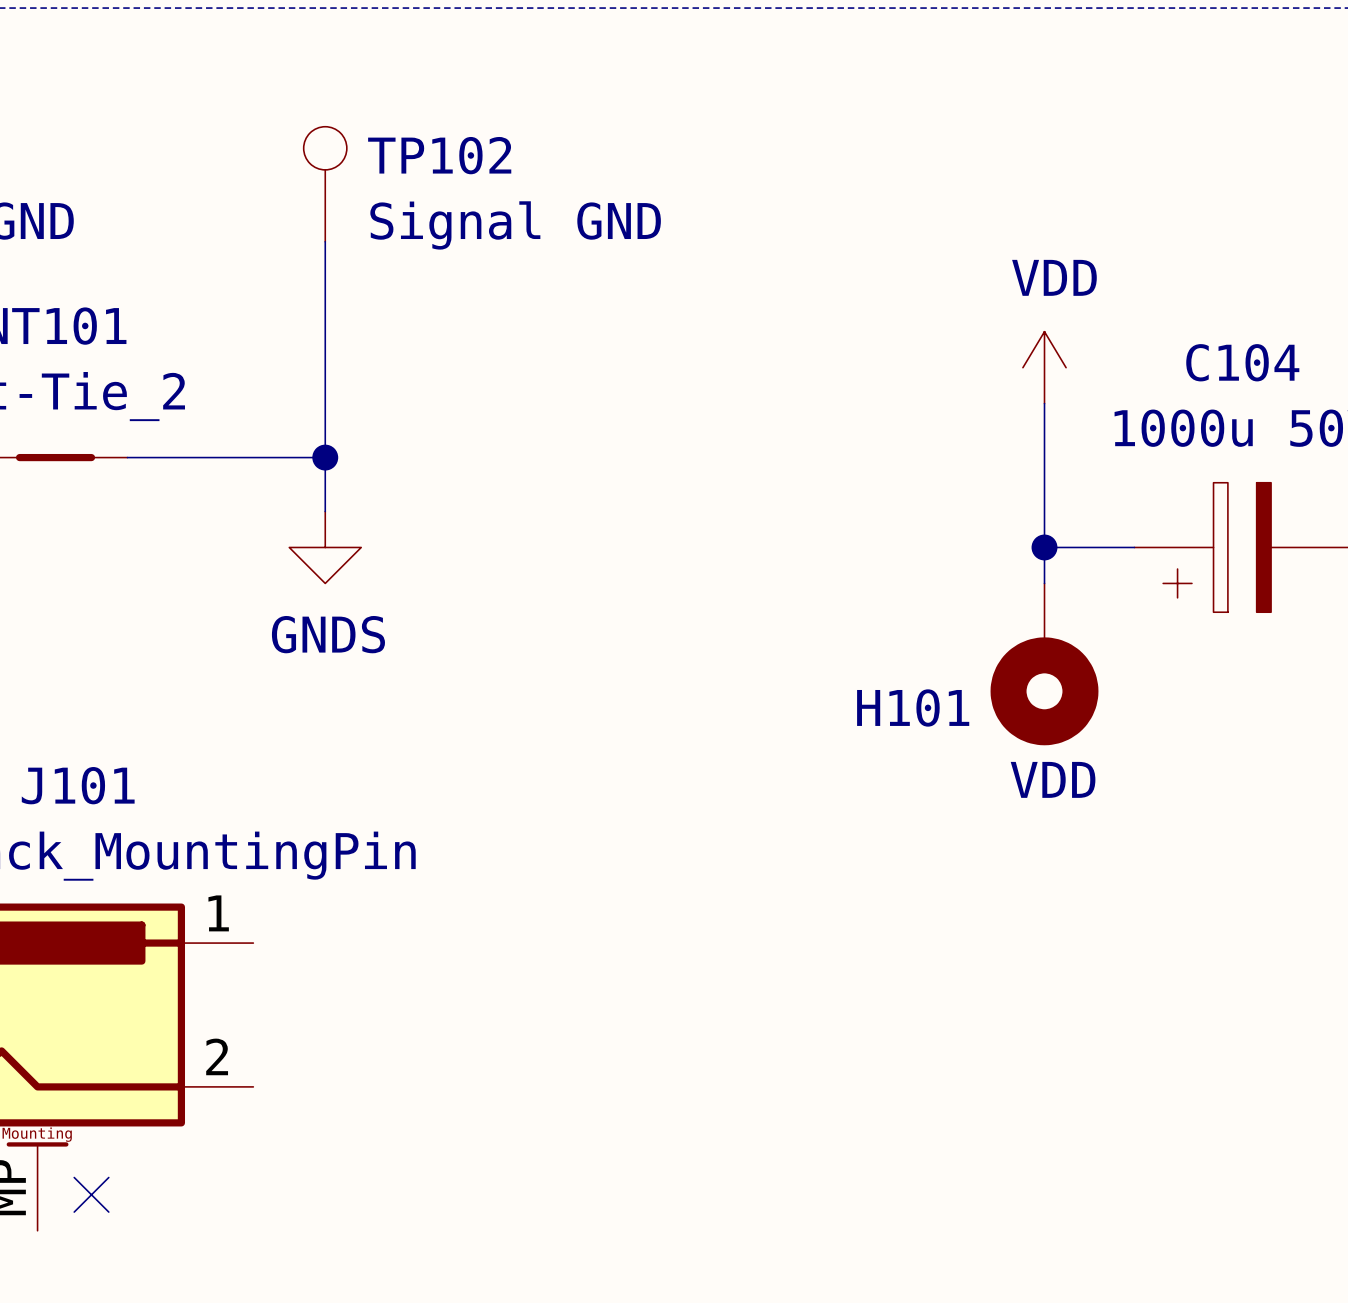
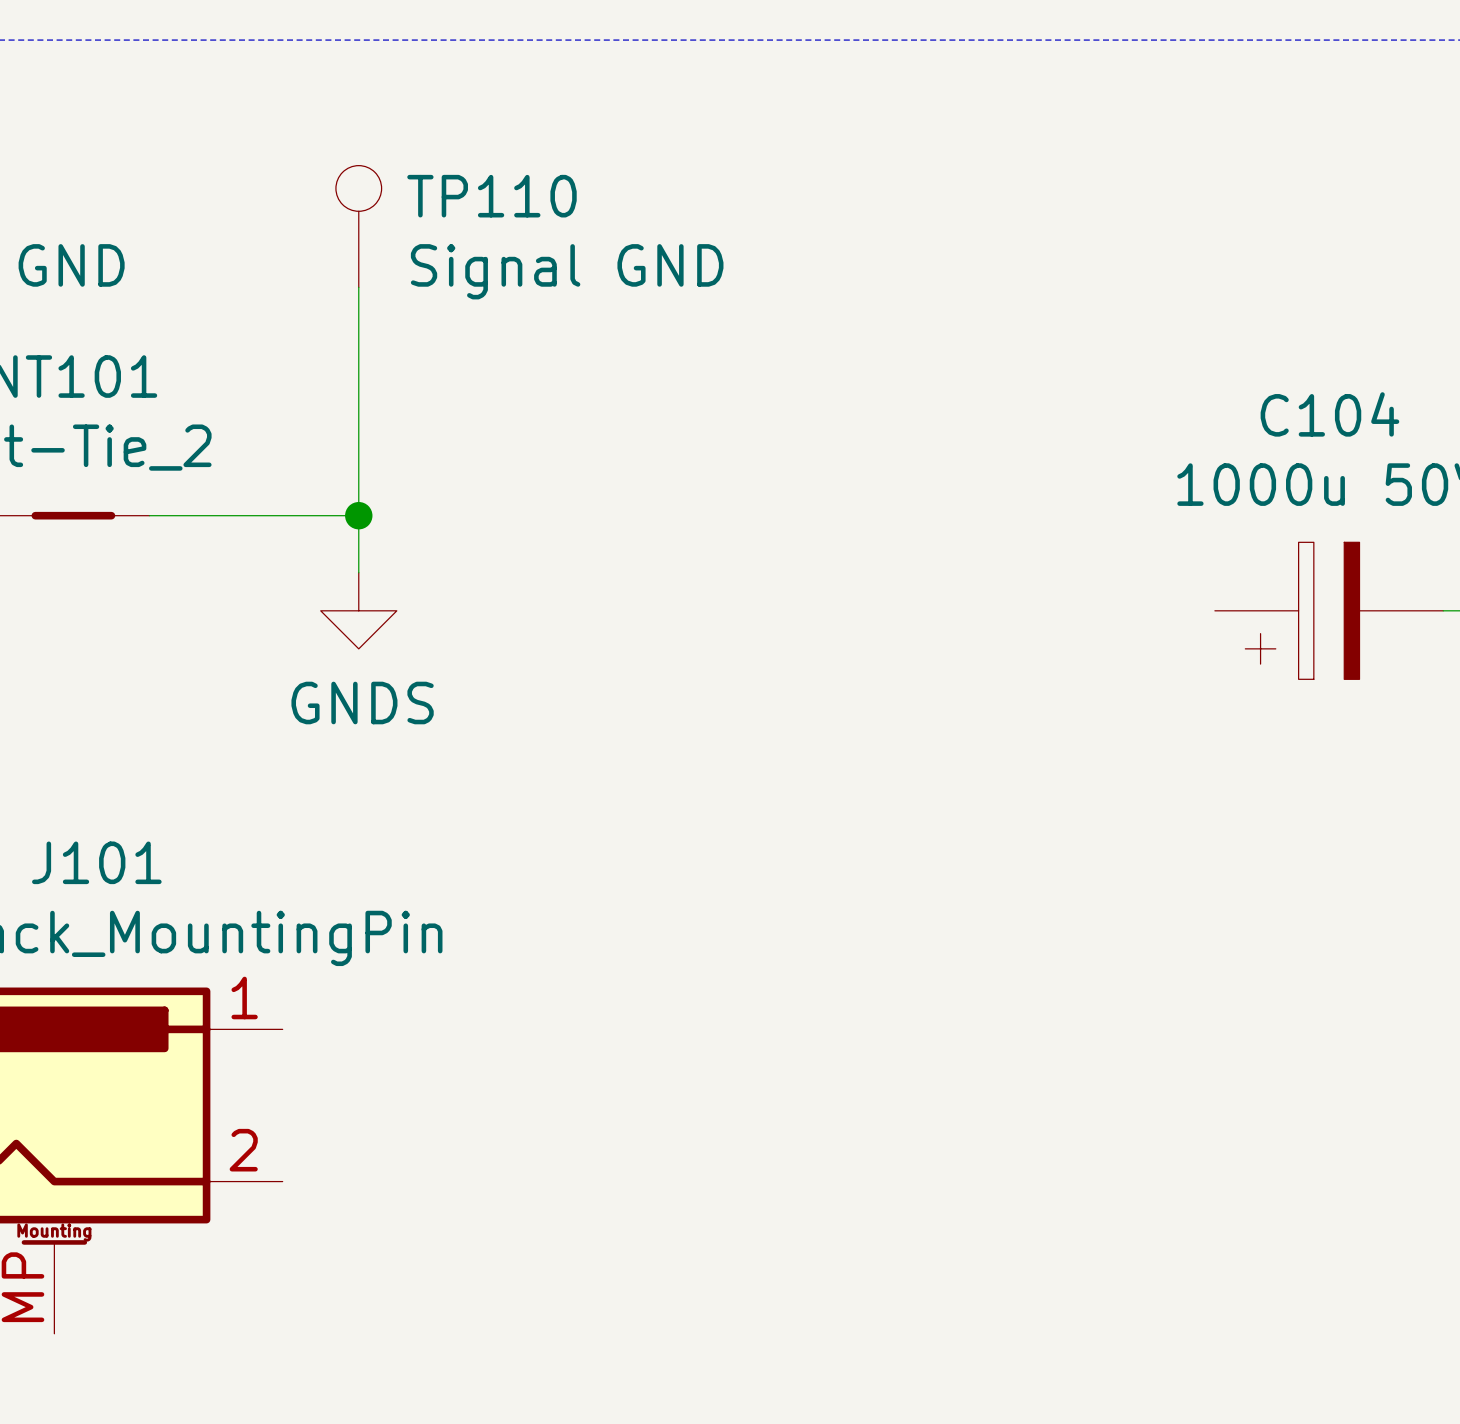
TP102 name: TP102 (439, 155) -> TP110 (491, 196)
power symbol: VDD (1044, 367) -> none
wire: (1044, 403) (1044, 583) -> none
wire: (1044, 547) (1134, 547) -> none
junction: (1044, 547) -> none
H101: VDD (1044, 664) -> none
no-connect mark: (91, 1194) -> none

